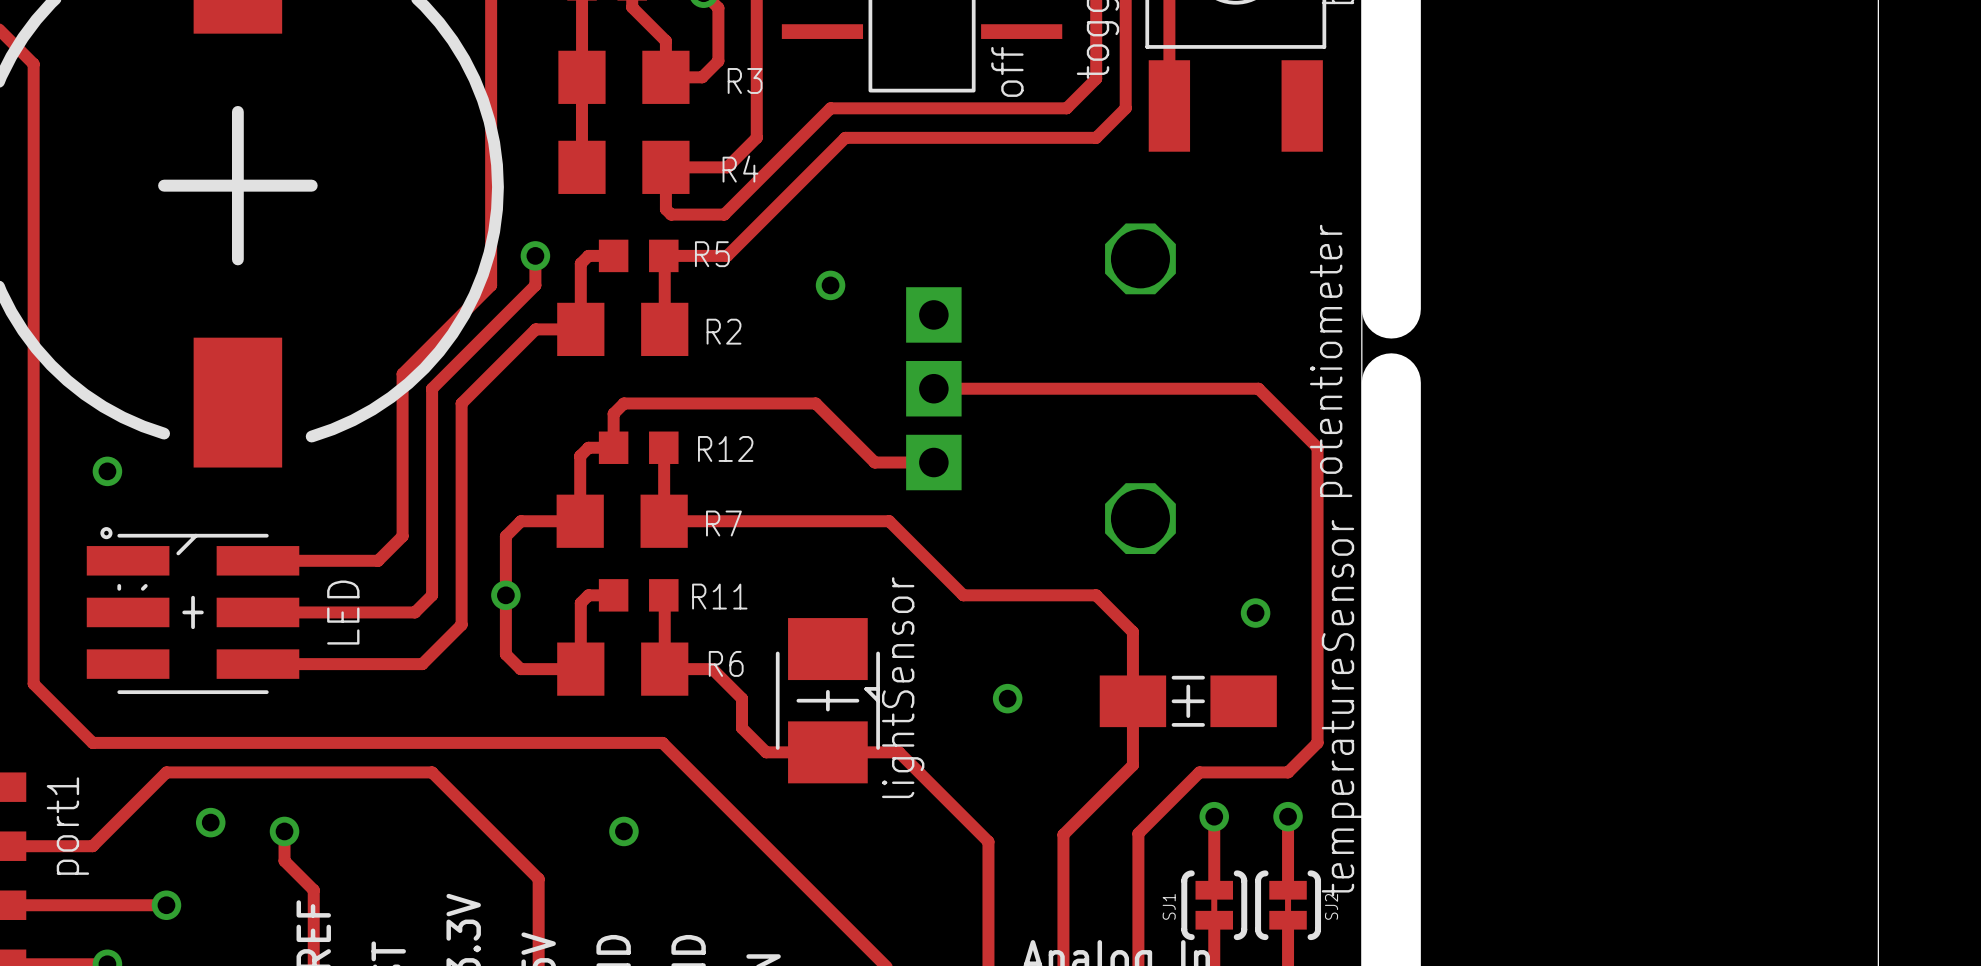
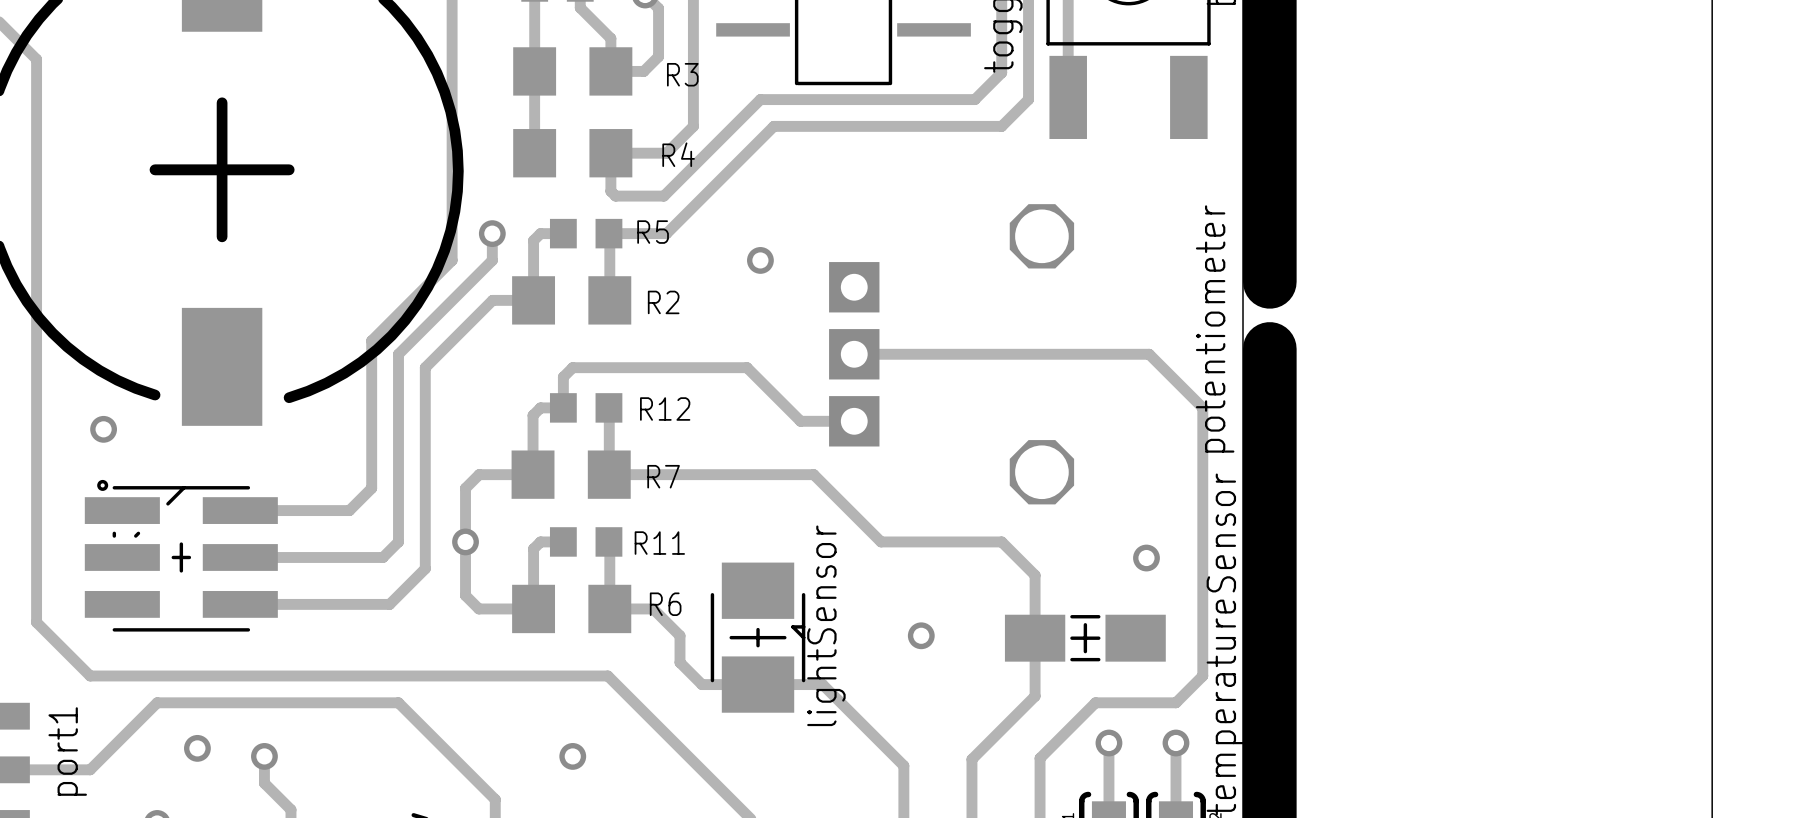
text: off (1007, 71) -> none
text: LED (343, 612) -> none

